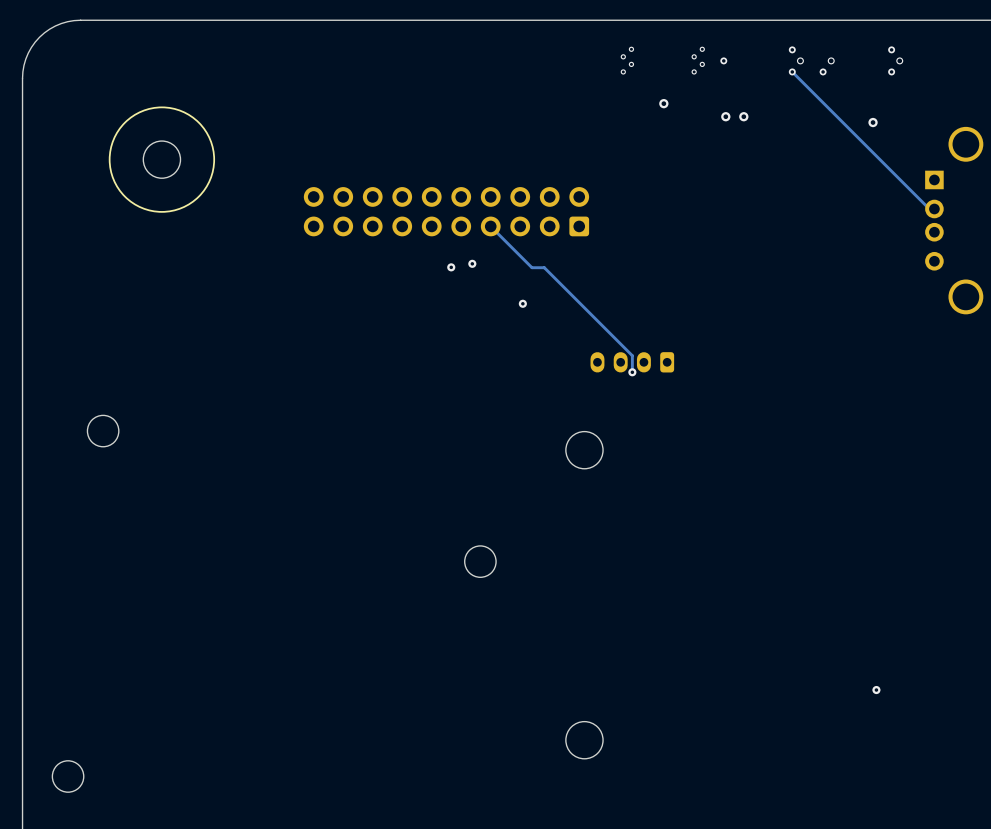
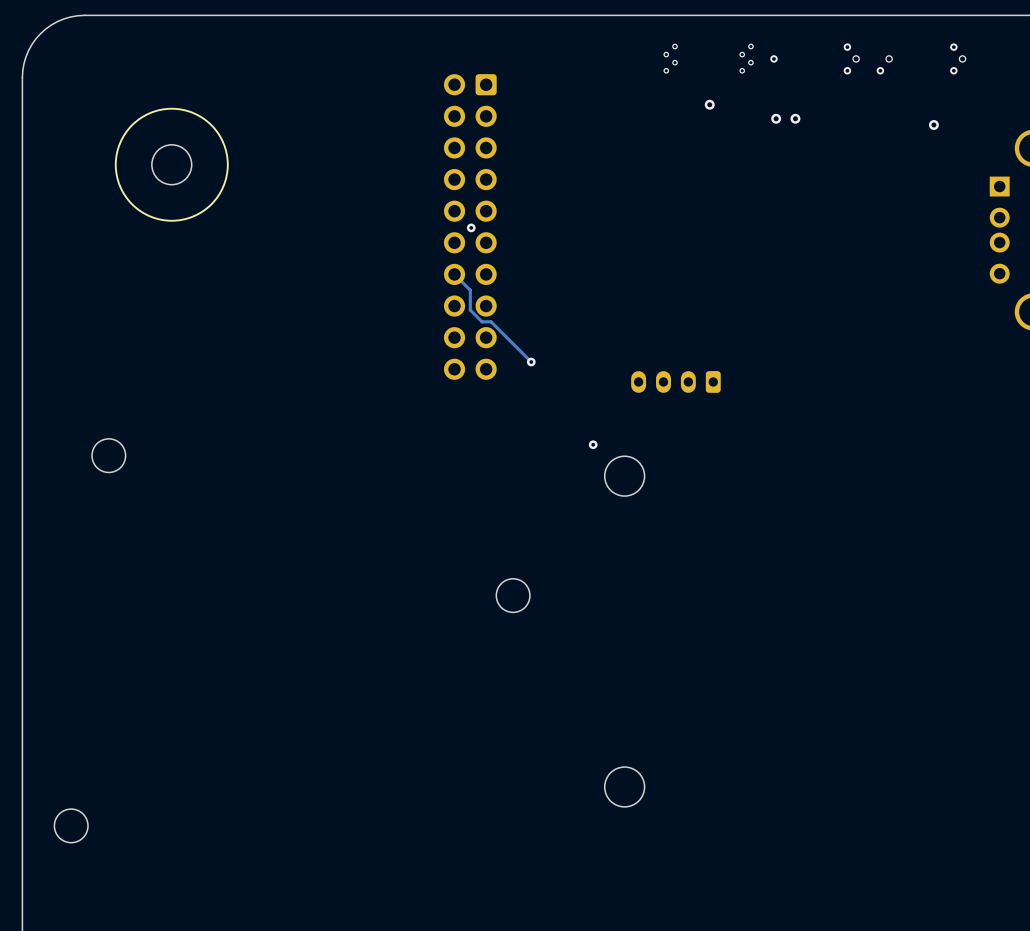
track: (792, 71) (929, 208) (934, 208) -> none
part rotation: 0° (446, 211) -> 90° counterclockwise (470, 226)
via: none -> (471, 227)
track: (490, 226) (531, 267) (544, 267) (632, 355) (632, 372) -> none
track: none -> (454, 274) (470, 290) (470, 310) (482, 321) (491, 321) (531, 362)
via: (472, 263) -> none
via: (451, 267) -> none
via: (522, 303) -> none
via: none -> (531, 362)
via: (632, 372) -> none
via: none -> (593, 444)
via: (876, 690) -> none

